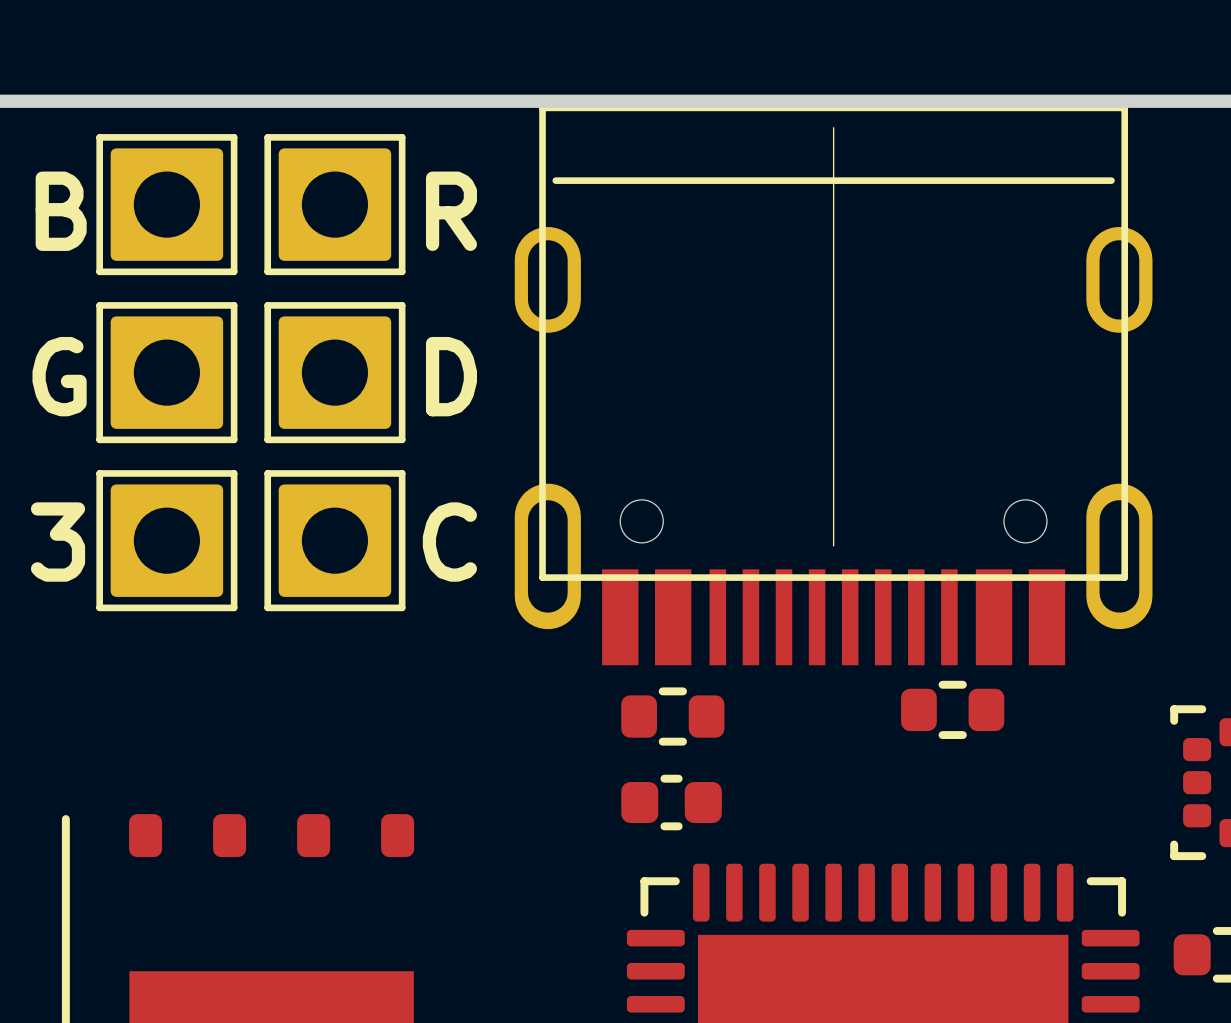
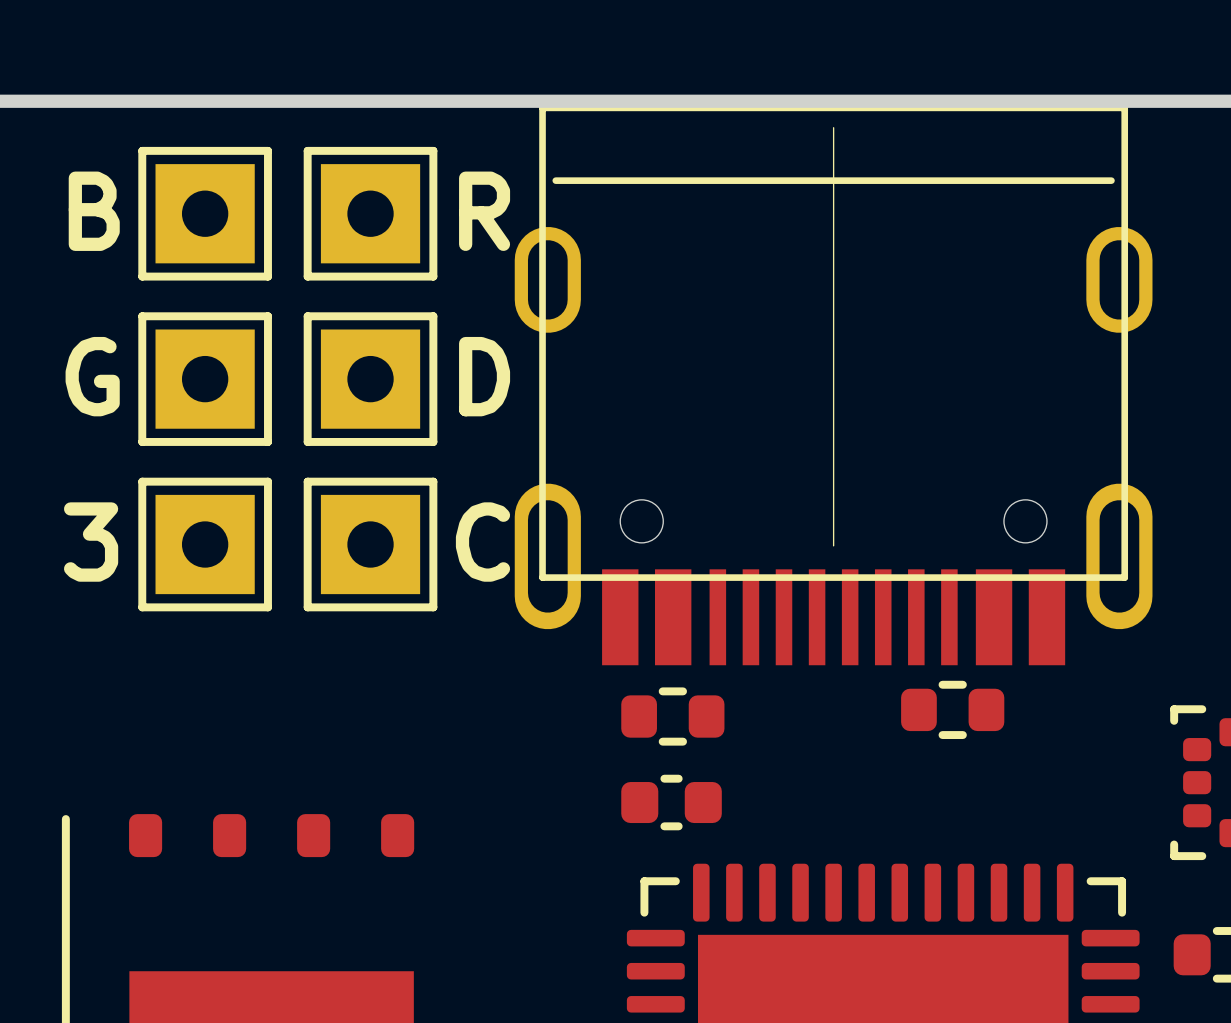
part footprint: [96, 134, 238, 276] -> [138, 146, 272, 281]
part footprint: [264, 134, 406, 276] -> [303, 146, 438, 281]
text position: B (61, 211) -> B (94, 211)
text position: R (451, 211) -> R (484, 211)
part footprint: [96, 302, 238, 444] -> [138, 312, 272, 446]
part footprint: [264, 302, 406, 444] -> [303, 312, 438, 446]
text position: G (59, 376) -> G (92, 376)
text position: D (451, 376) -> D (484, 376)
part footprint: [96, 470, 238, 612] -> [138, 477, 272, 612]
part footprint: [264, 470, 406, 612] -> [303, 477, 438, 612]
text position: 3 (58, 542) -> 3 (91, 542)
text position: C (449, 542) -> C (482, 542)

